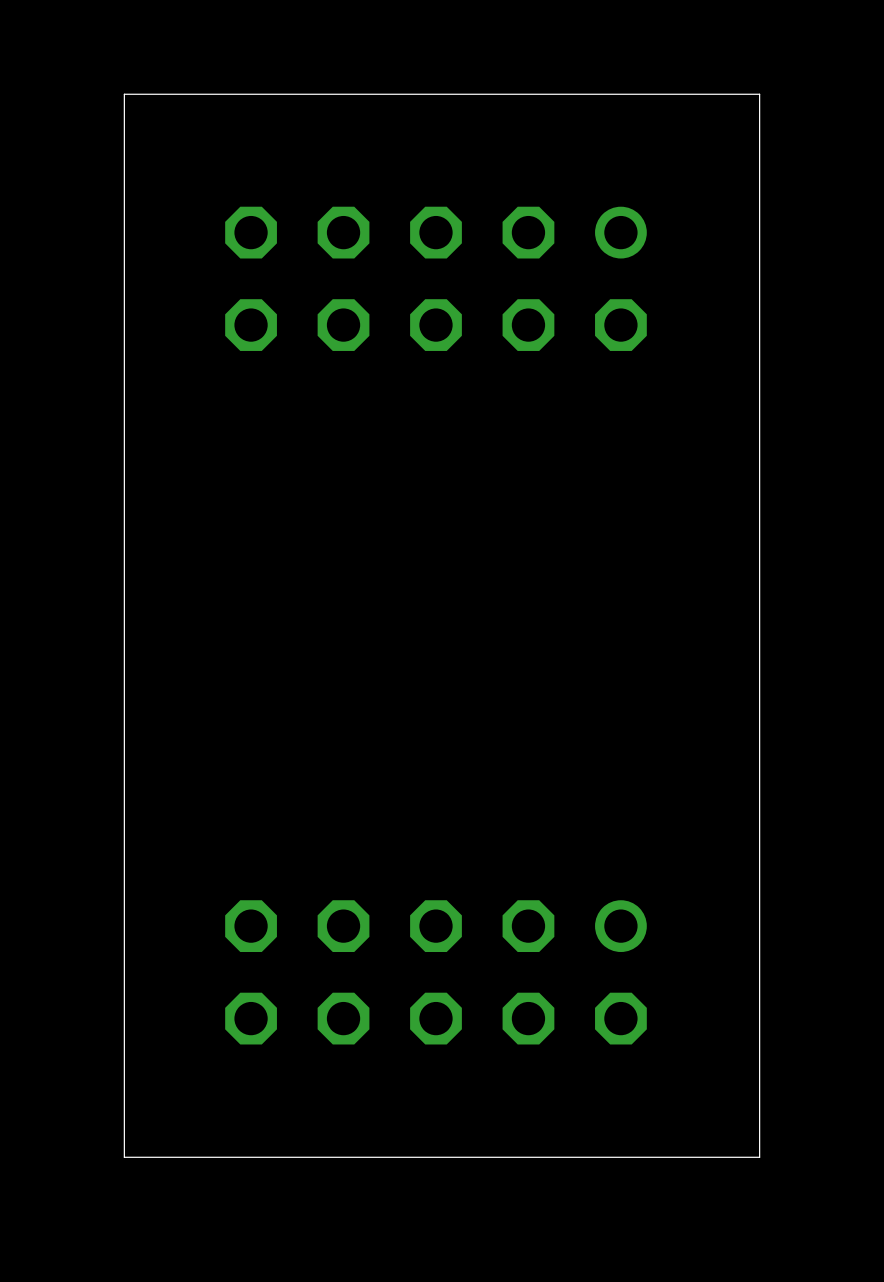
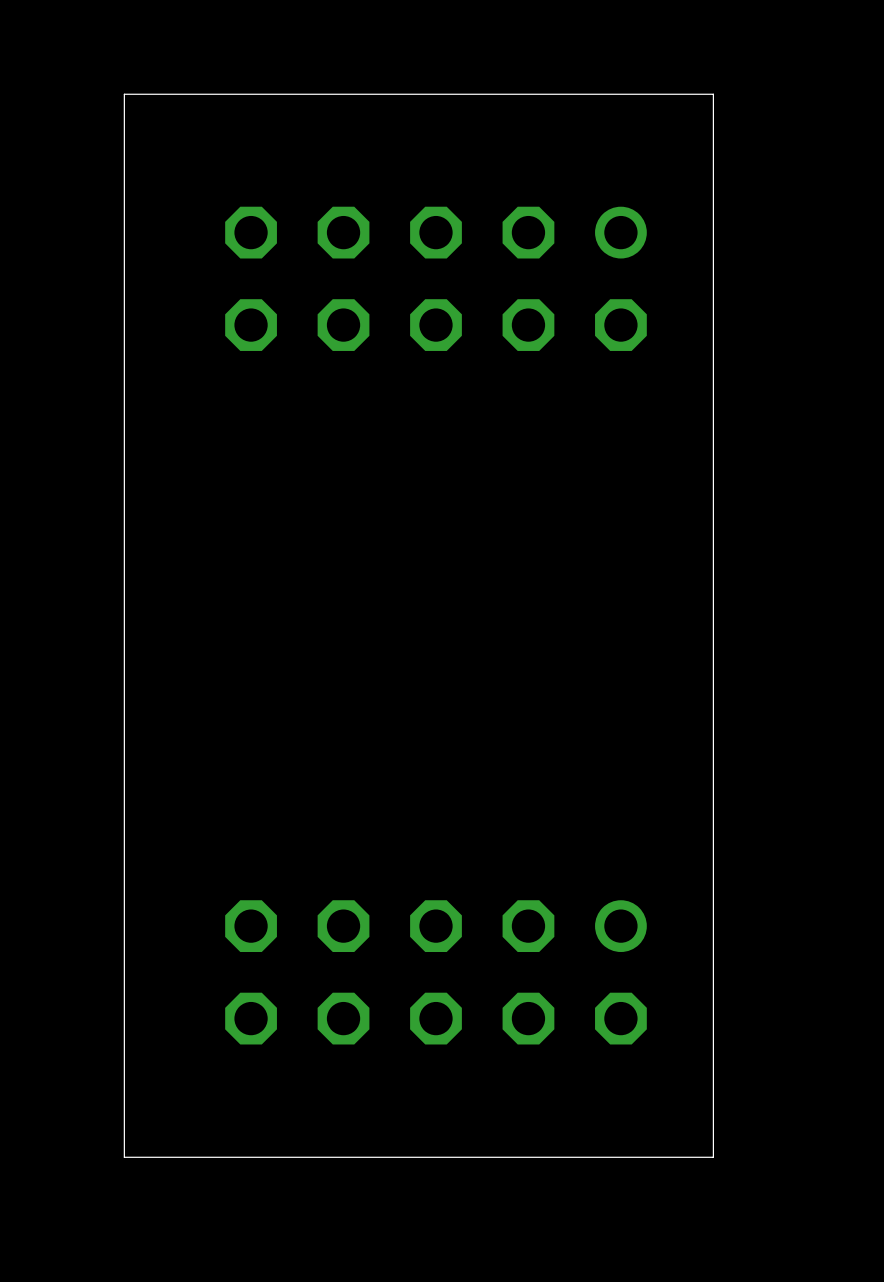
board edge: (713, 94) (759, 94) (759, 1157) (713, 1157) -> (713, 94) (713, 1157)

